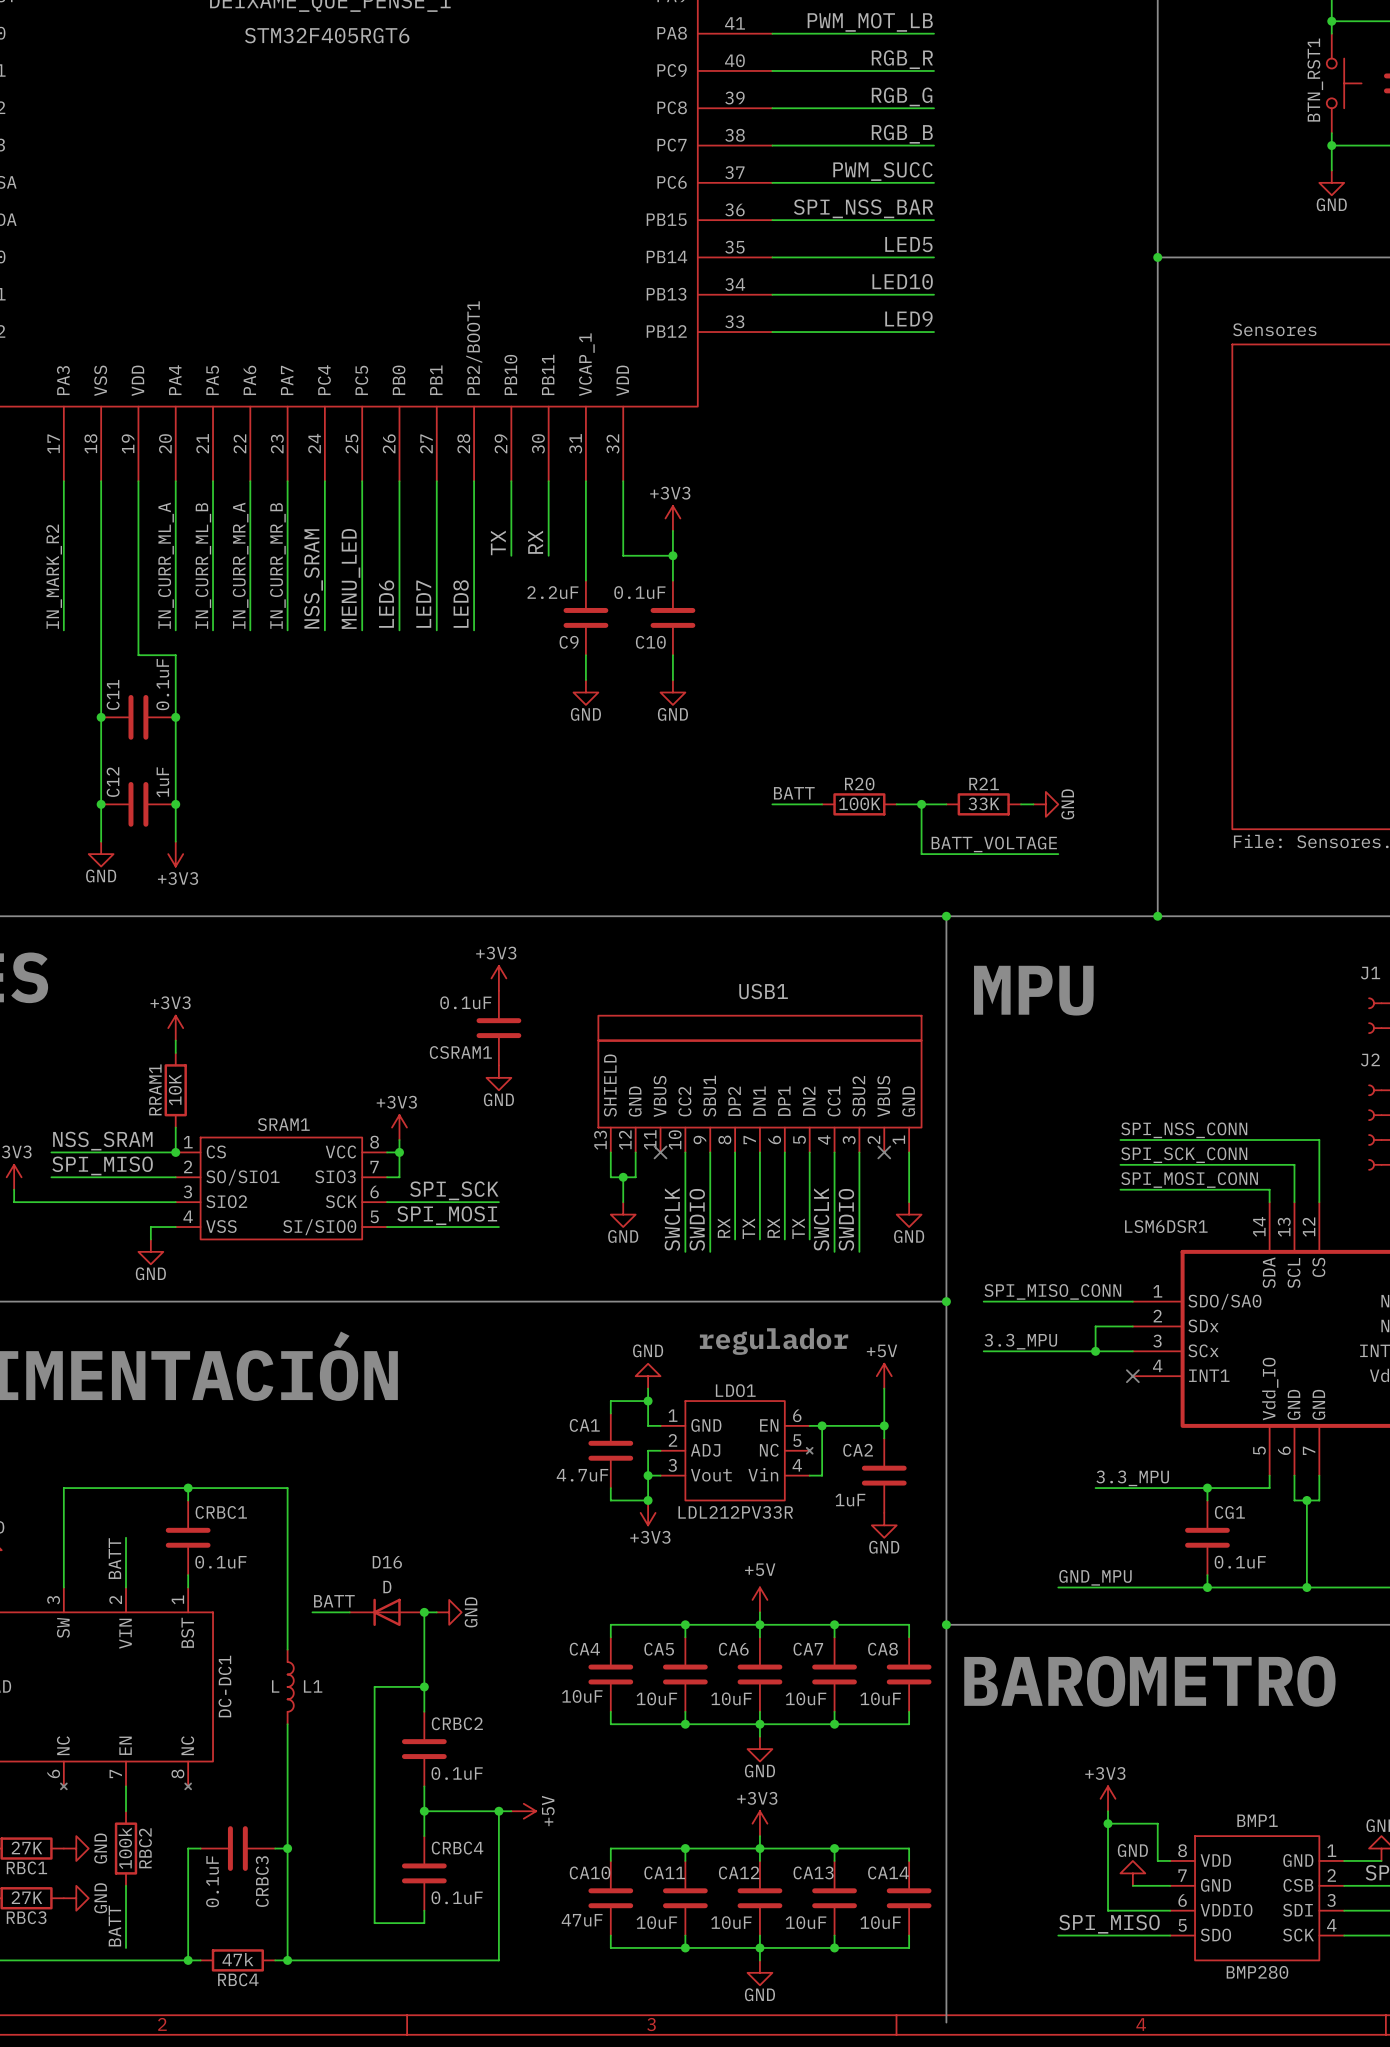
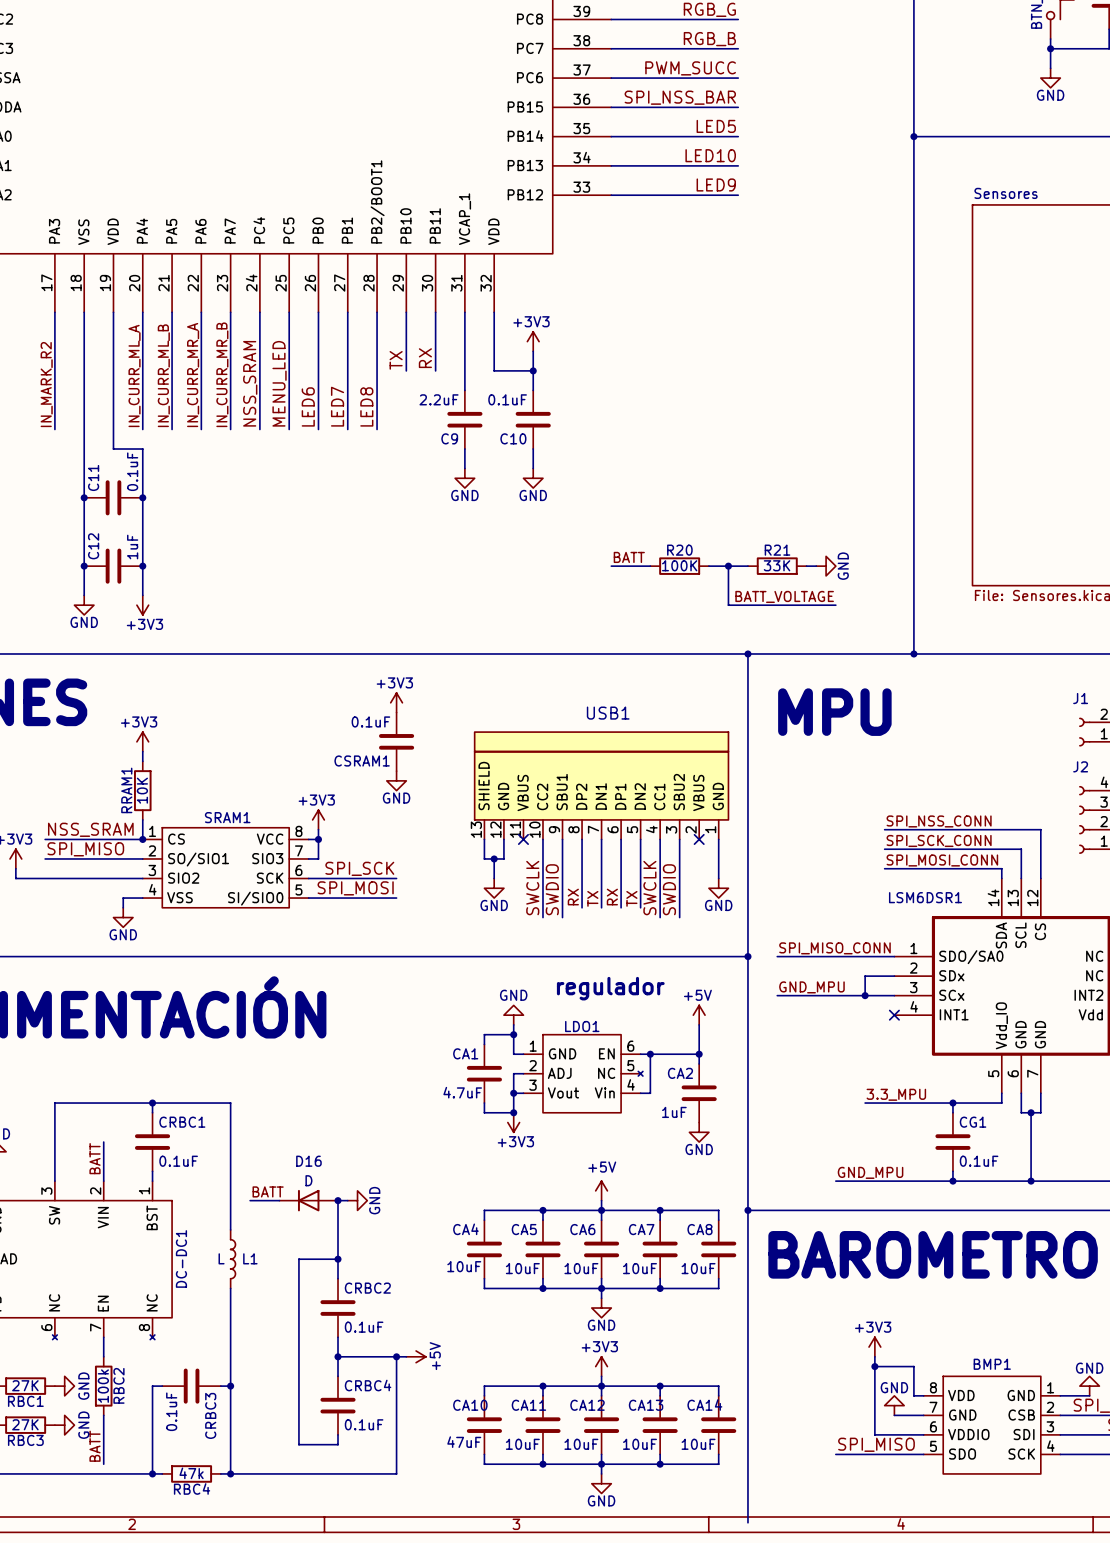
label: 3.3_MPU (1020, 1341) -> GND_MPU (811, 987)
LDO1 value: LDL212PV33R (735, 1512) -> none
BMP1 value: BMP280 (1257, 1972) -> none

